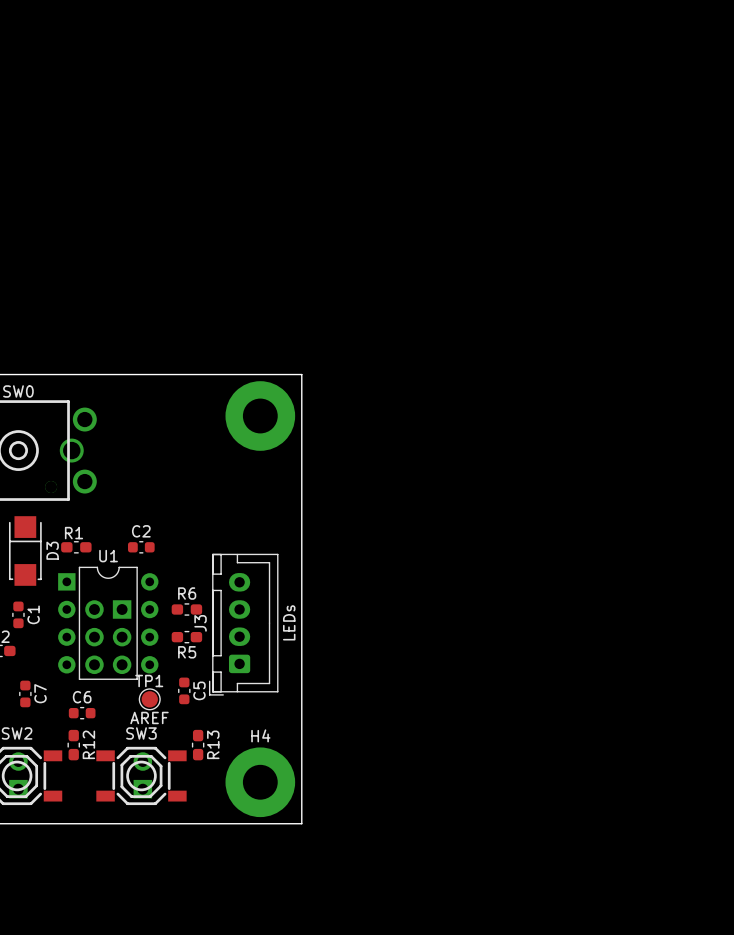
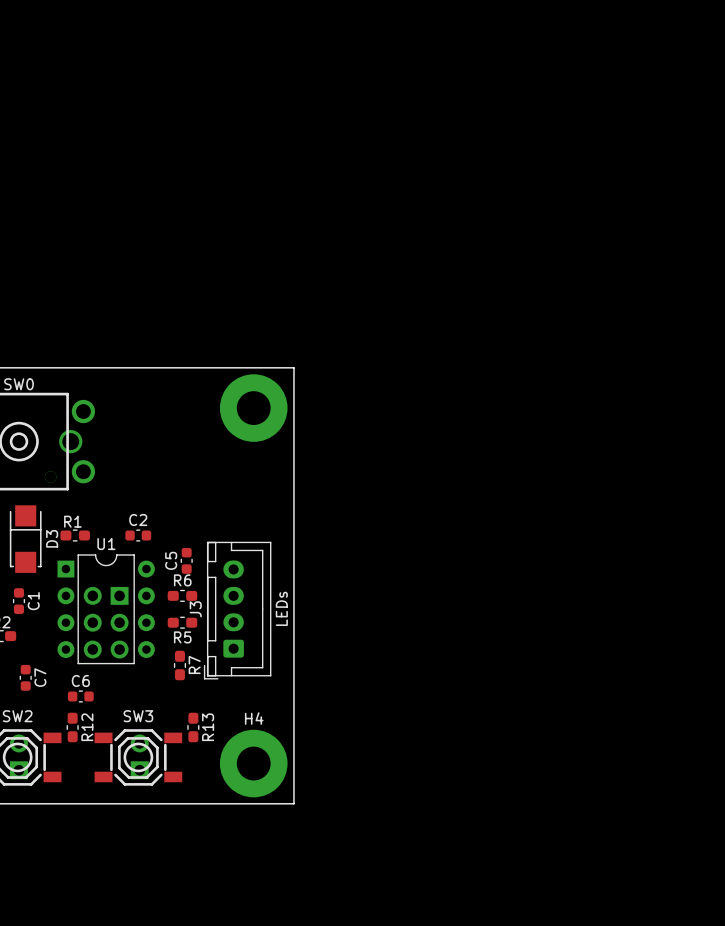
R7: none -> (179, 665)
C5 position: (184, 690) -> (186, 560)
C5 name position: C5 (199, 690) -> C5 (171, 560)
TP1: AREF (149, 699) -> none

